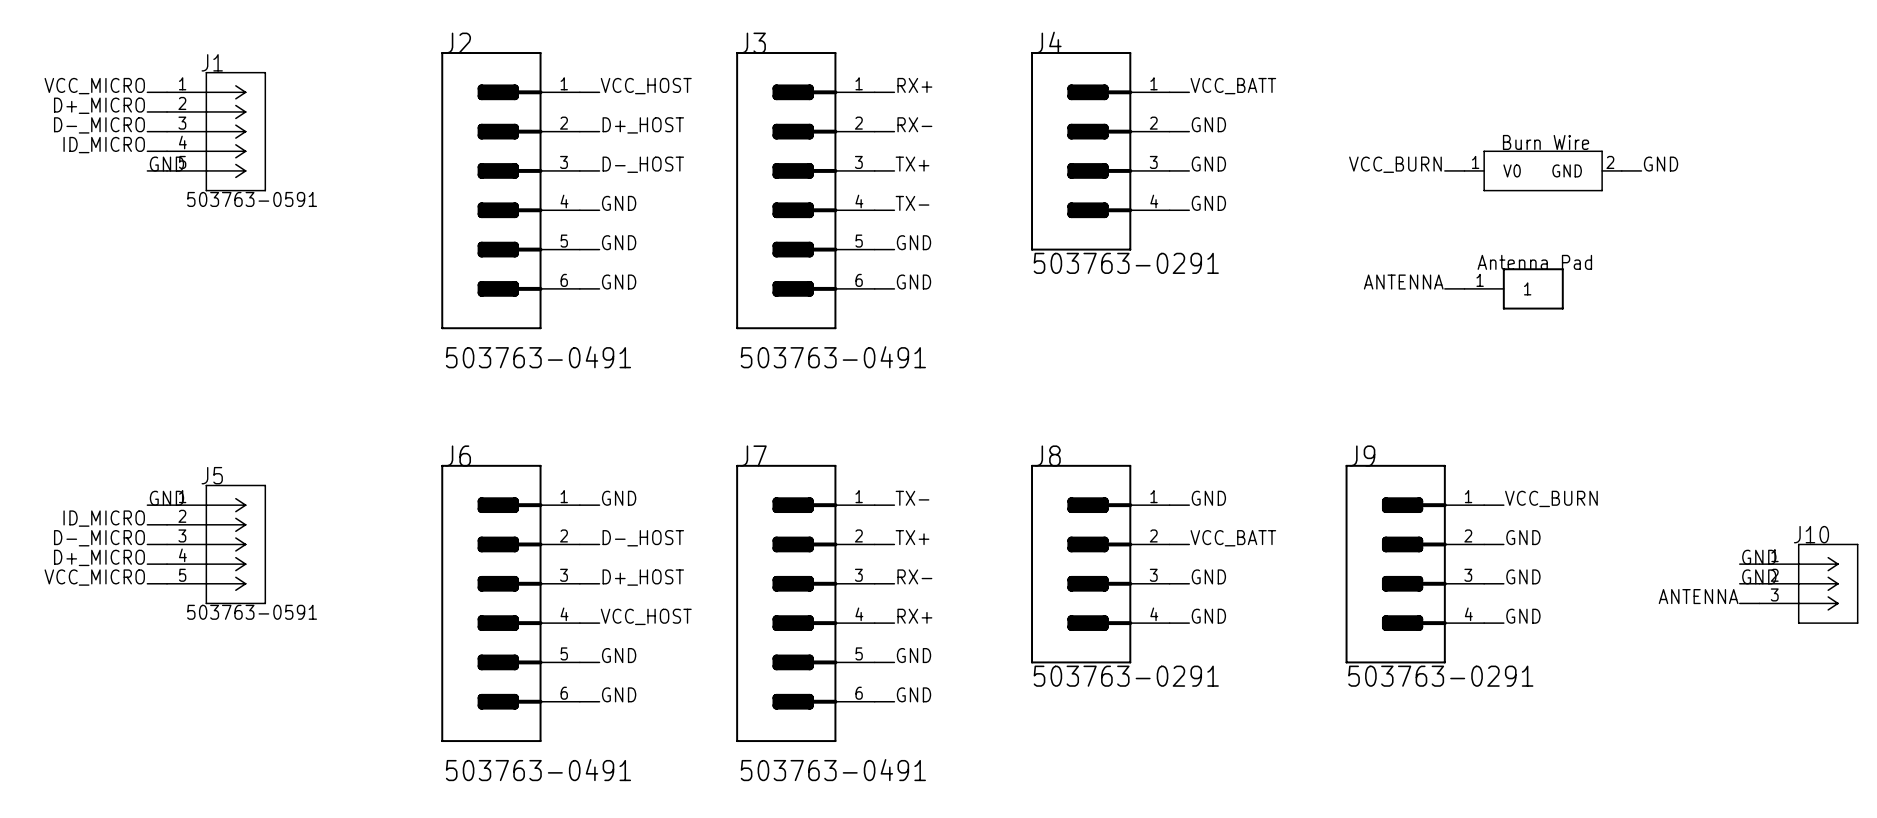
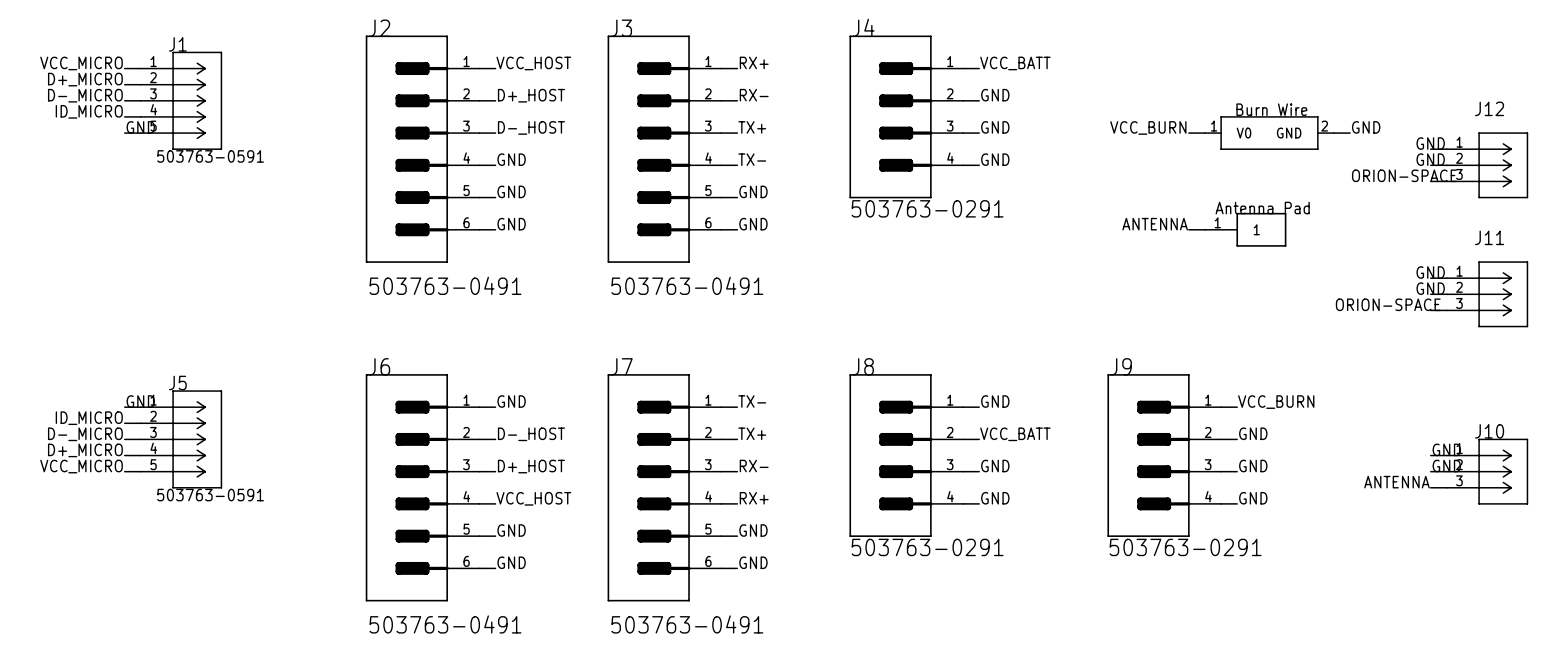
label: none -> GND (1430, 143)
wire: none -> (1430, 149) (1446, 149)
label: none -> GND (1430, 159)
wire: none -> (1430, 165) (1446, 165)
J12: none -> (1487, 165)
label: none -> ORION-SPACE (1404, 175)
wire: none -> (1430, 181) (1446, 181)
label: none -> GND (1430, 272)
wire: none -> (1430, 278) (1446, 278)
label: none -> GND (1430, 288)
wire: none -> (1430, 294) (1446, 294)
J11: none -> (1487, 294)
label: none -> ORION-SPACE (1388, 304)
wire: none -> (1430, 310) (1446, 310)

